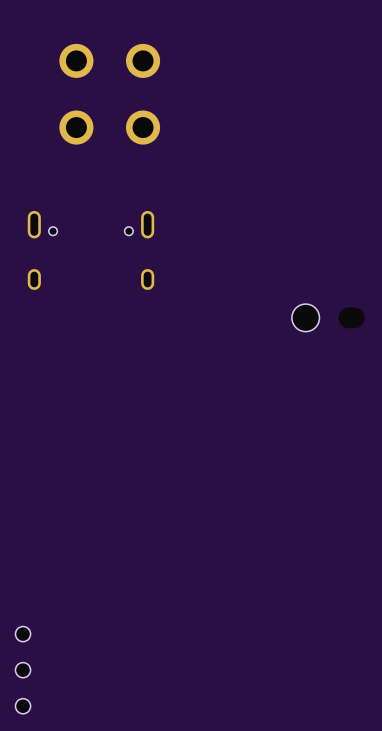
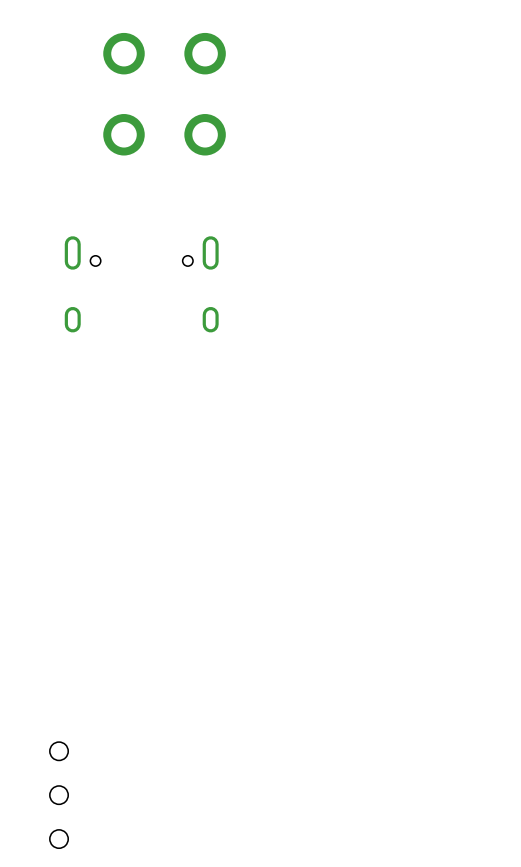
part: (328, 317) -> none

